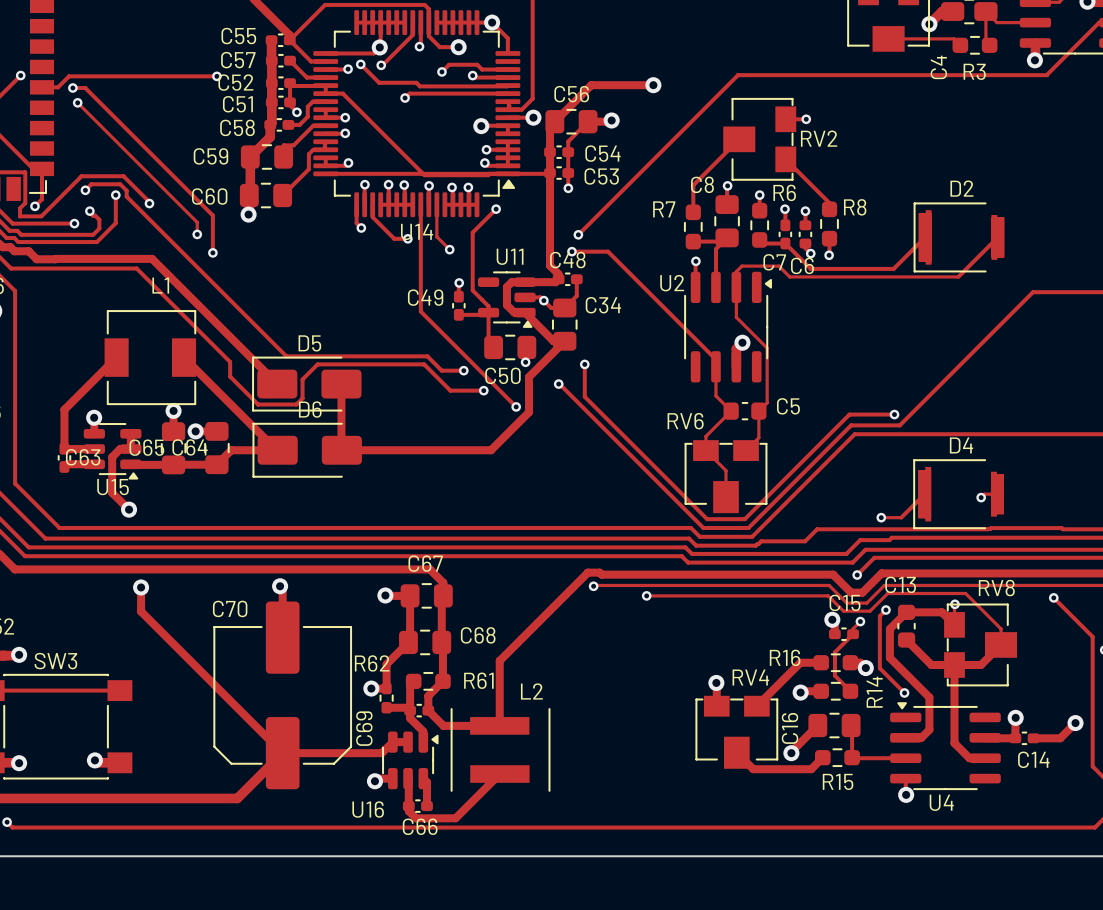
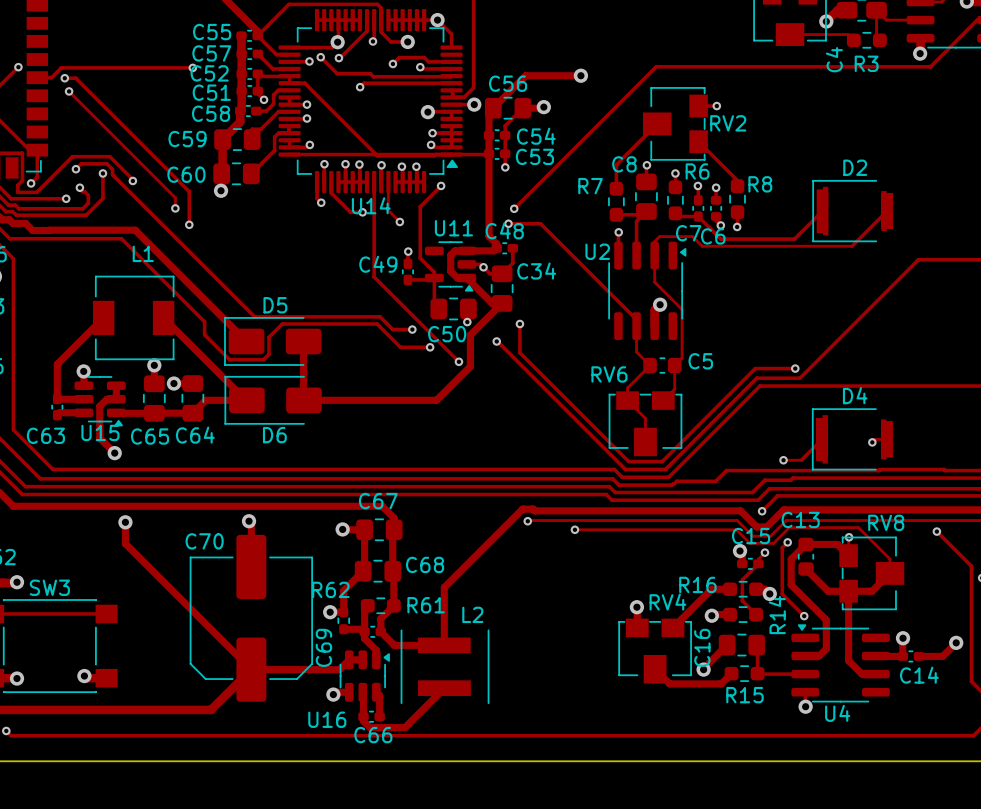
D6 name position: D6 (310, 409) -> D6 (274, 435)
C65 name position: C65 (146, 447) -> C65 (150, 436)
C64 name position: C64 (190, 447) -> C64 (195, 435)
C63 name position: C63 (83, 457) -> C63 (45, 435)

